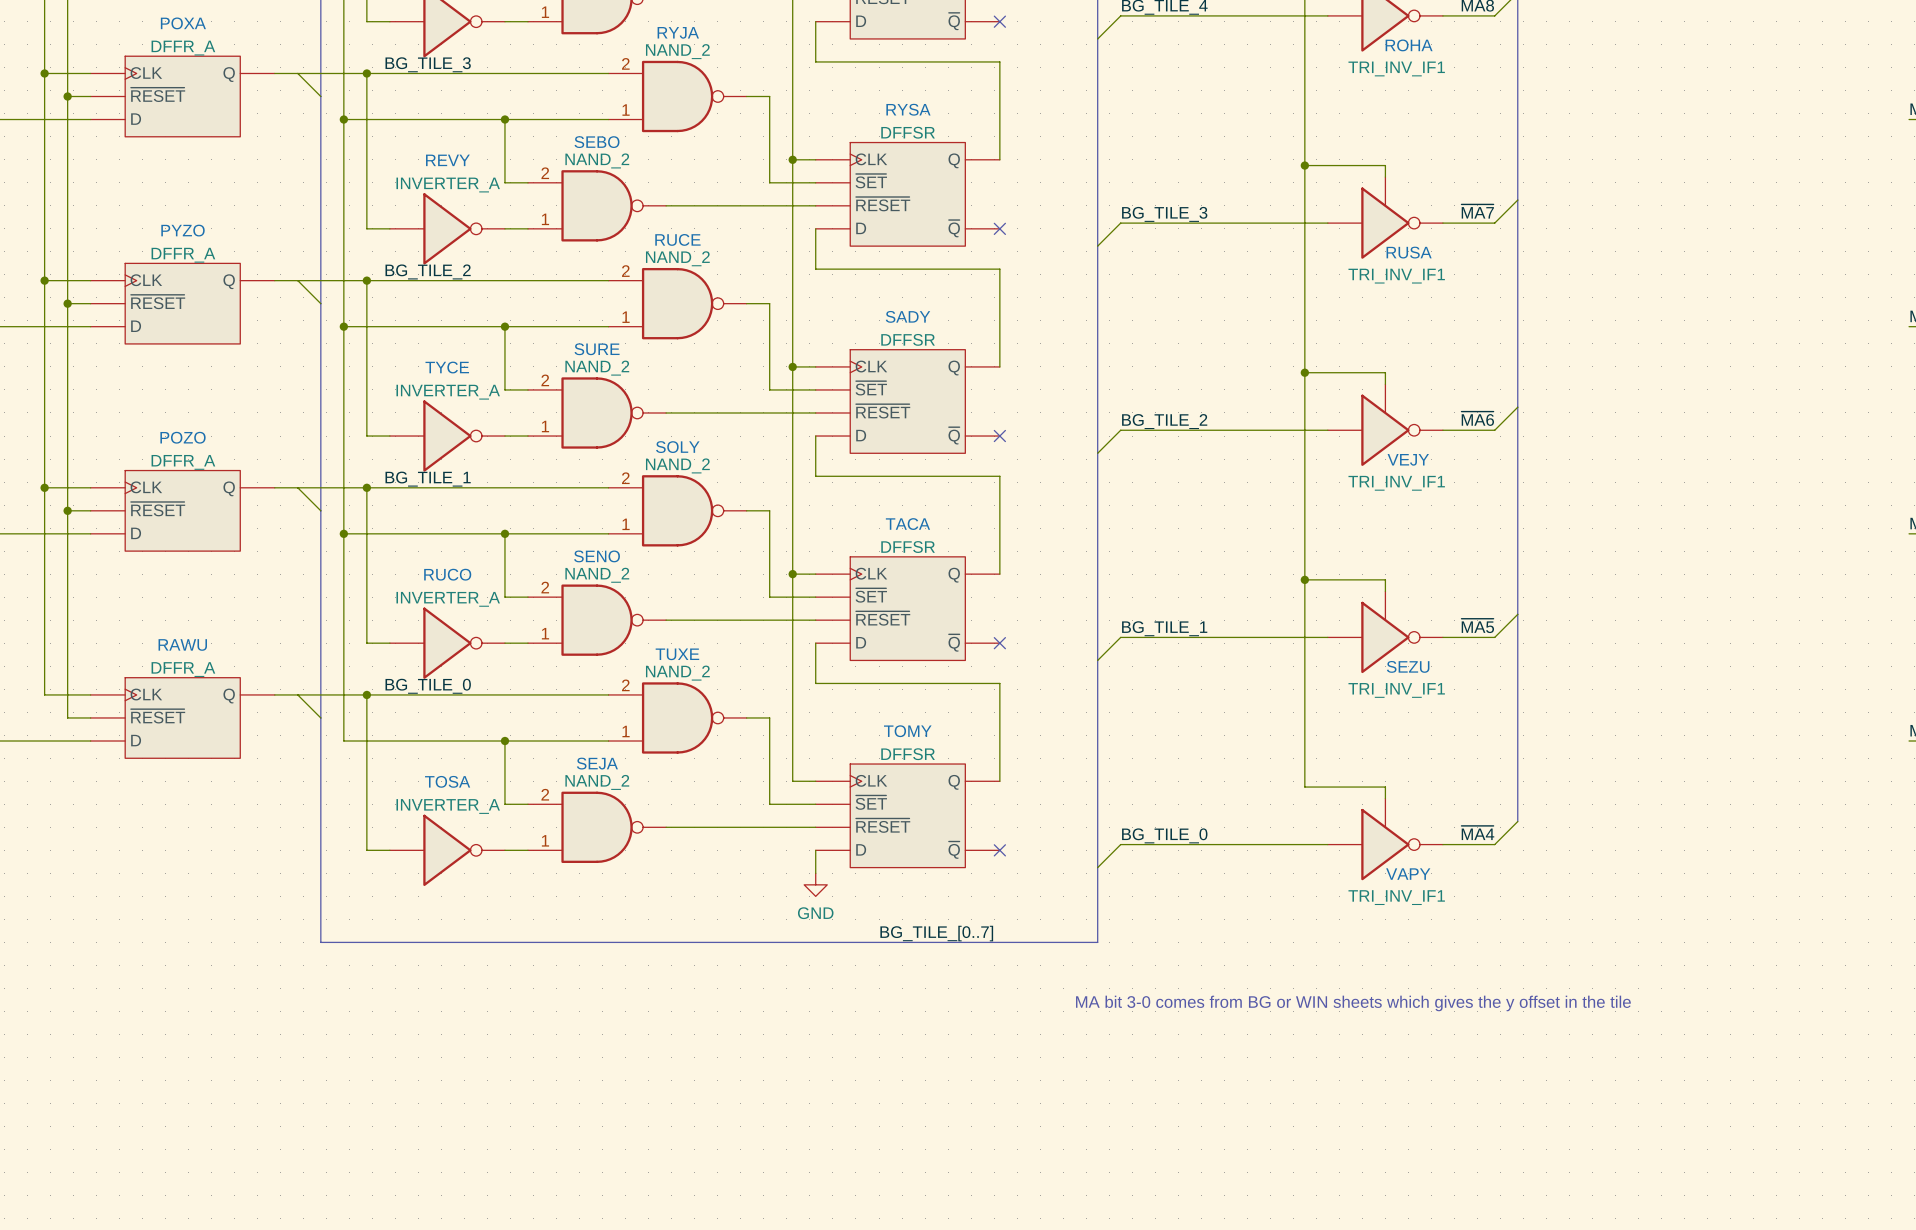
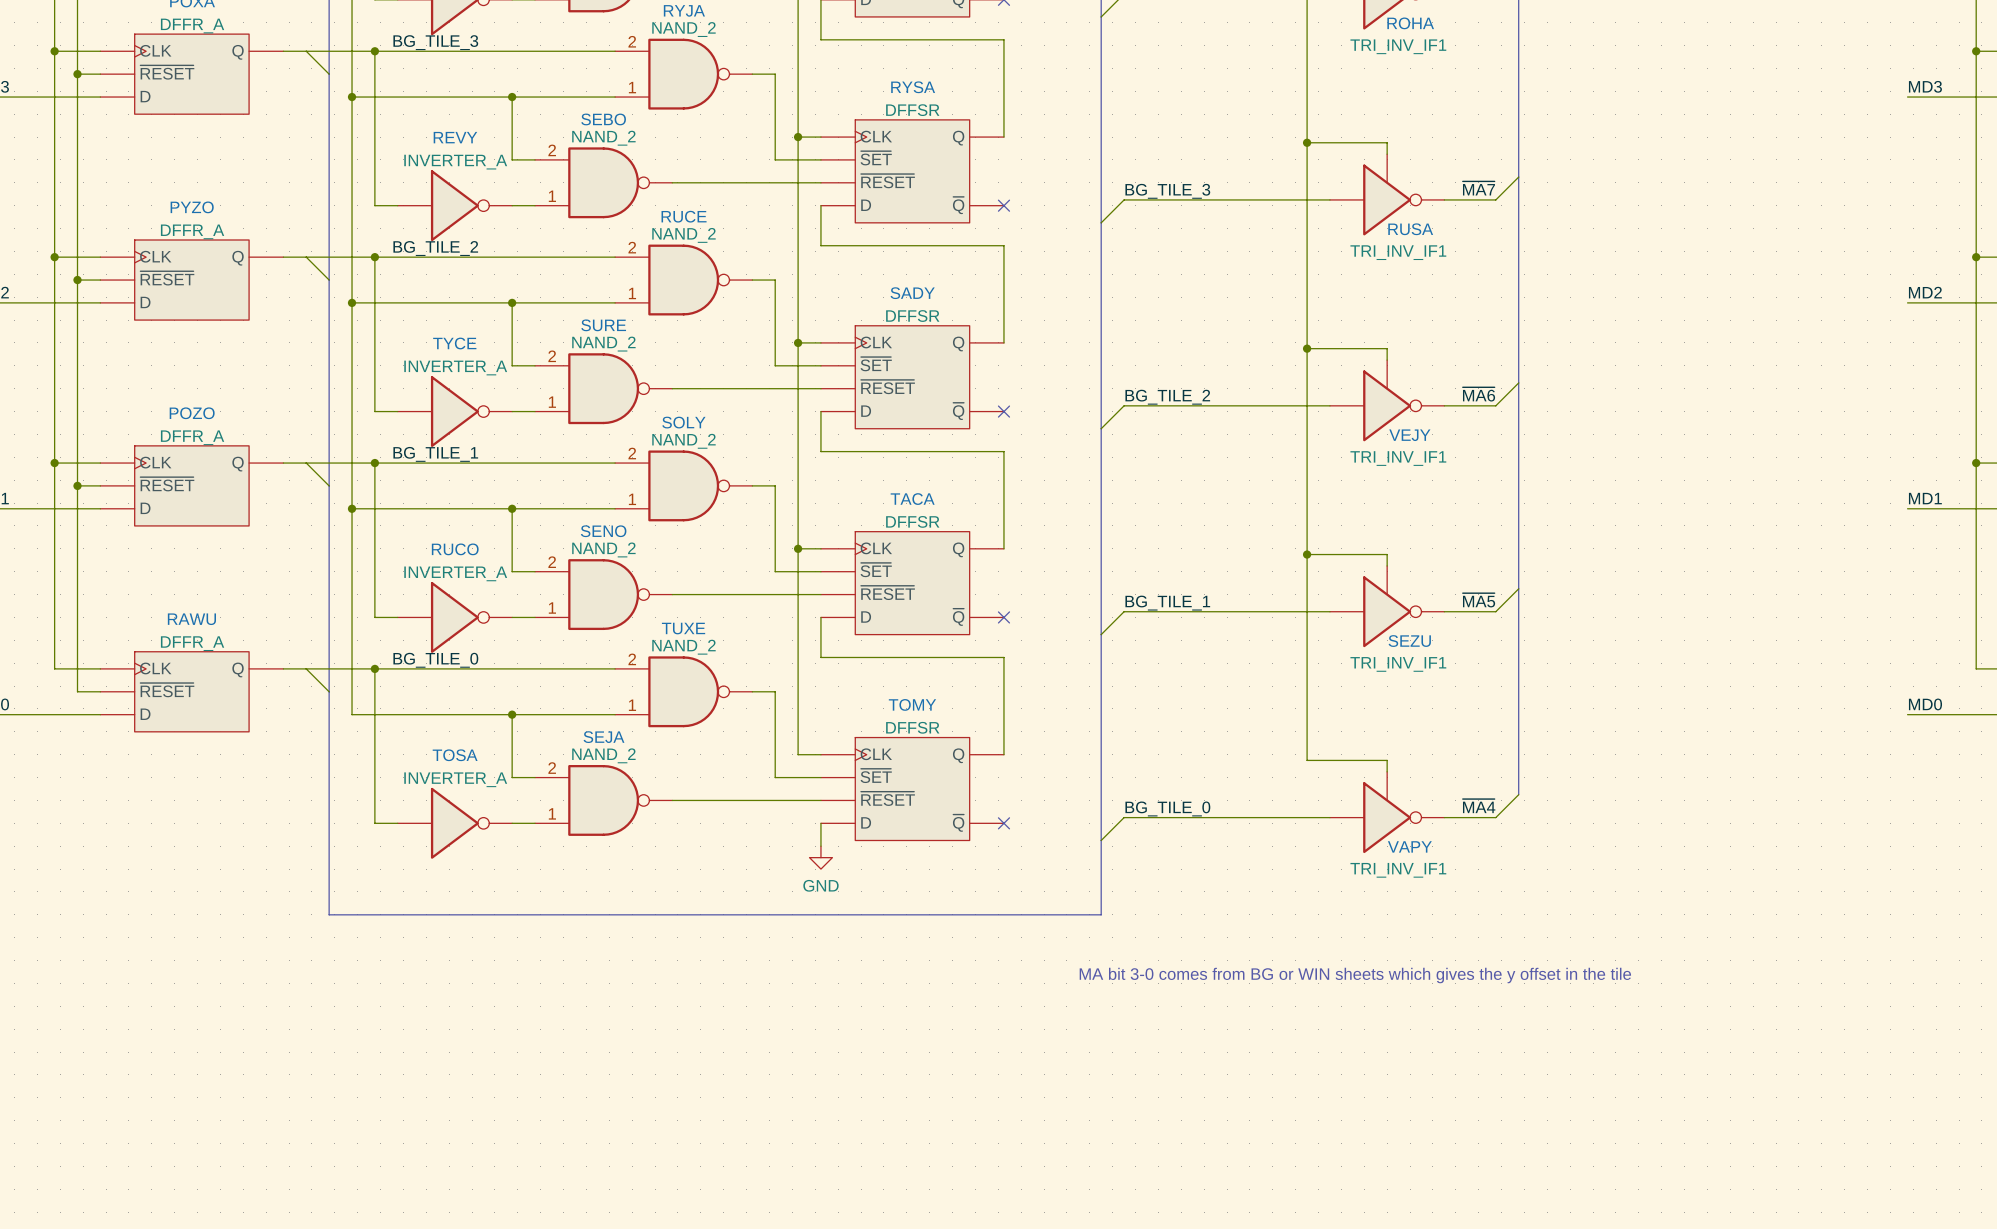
label: BG_TILE_[0..7] (936, 933) -> none

